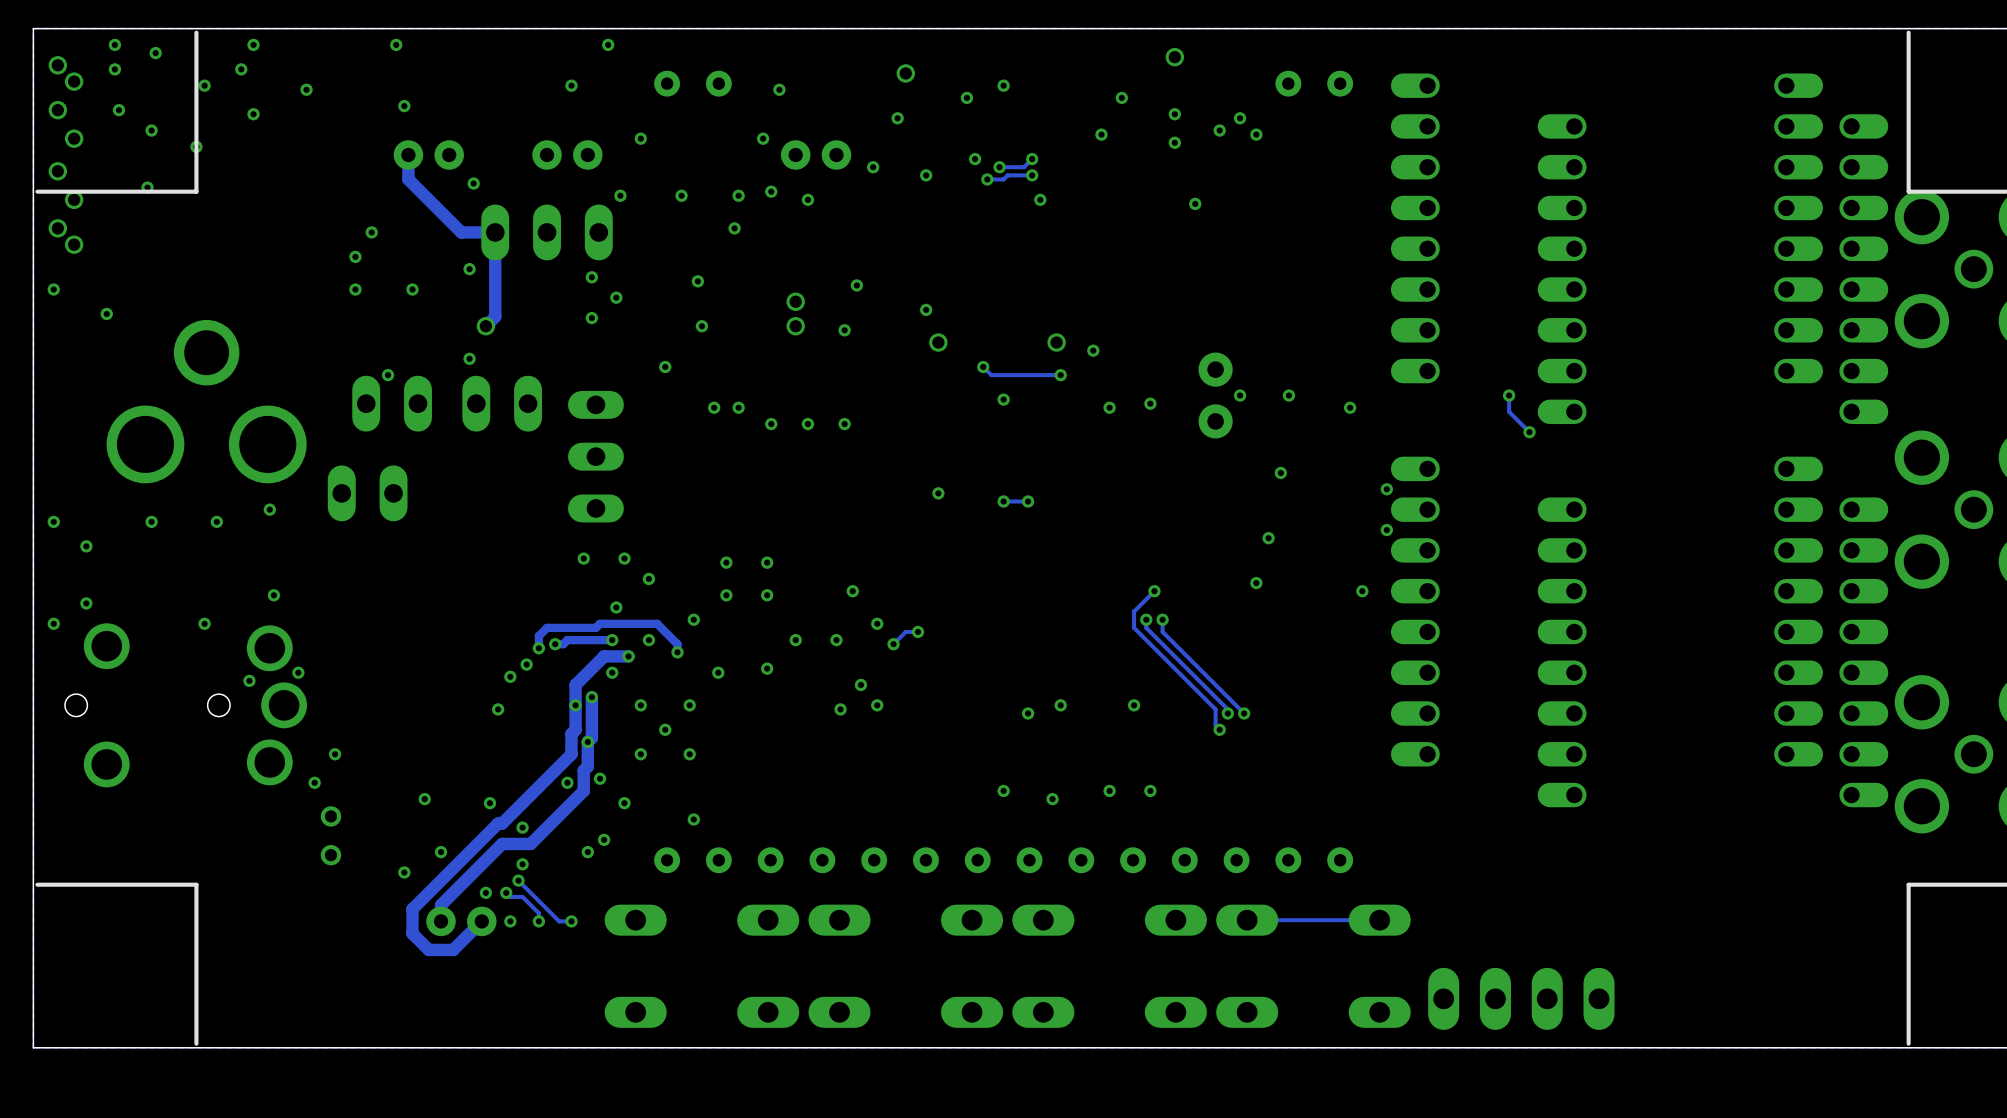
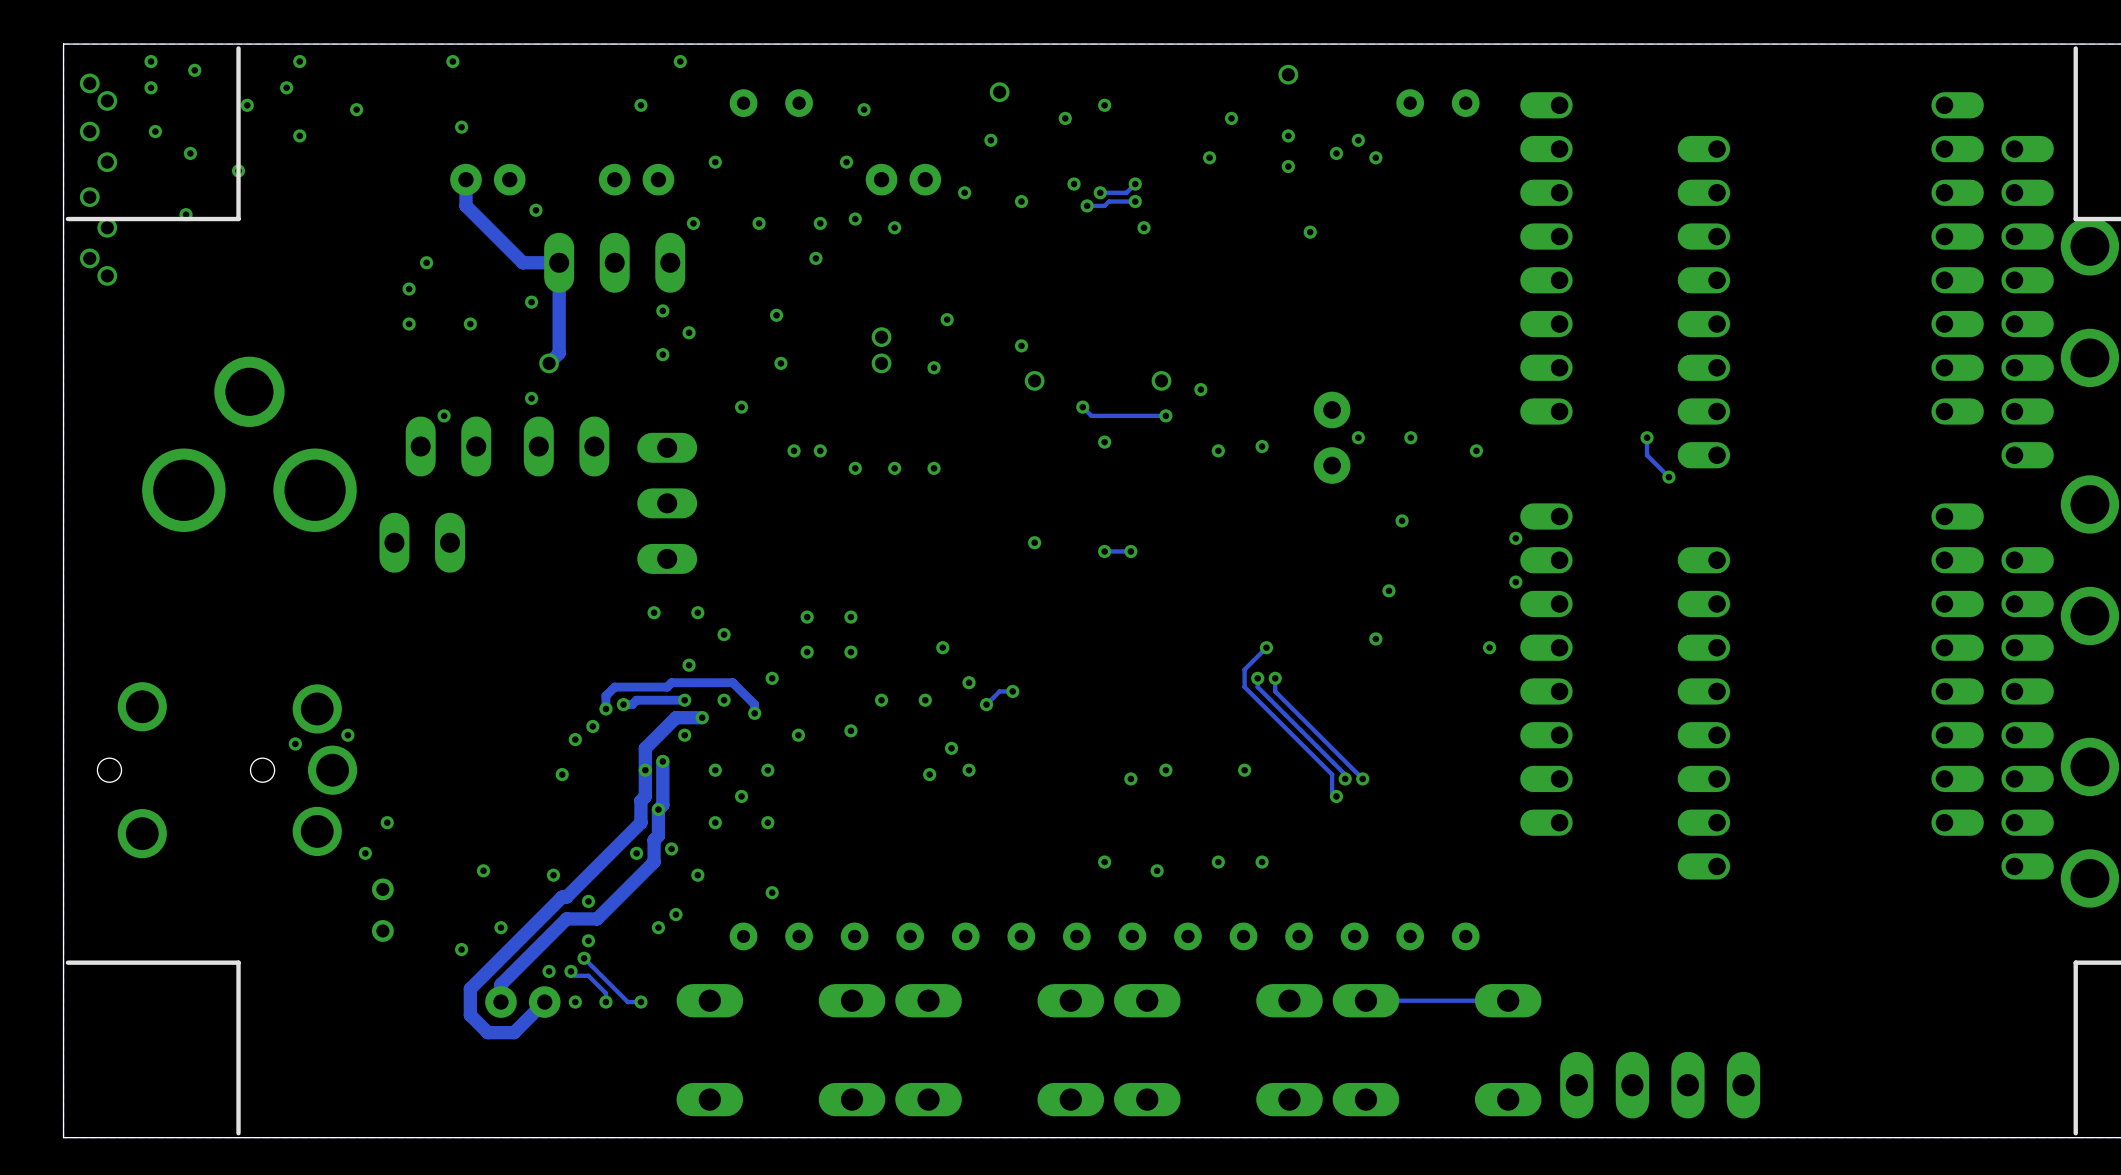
via: (53, 289) -> none
via: (106, 313) -> none
via: (269, 509) -> none
via: (53, 521) -> none
via: (151, 521) -> none
via: (216, 521) -> none
via: (86, 546) -> none
via: (273, 595) -> none
via: (86, 603) -> none
via: (53, 623) -> none
via: (204, 623) -> none

